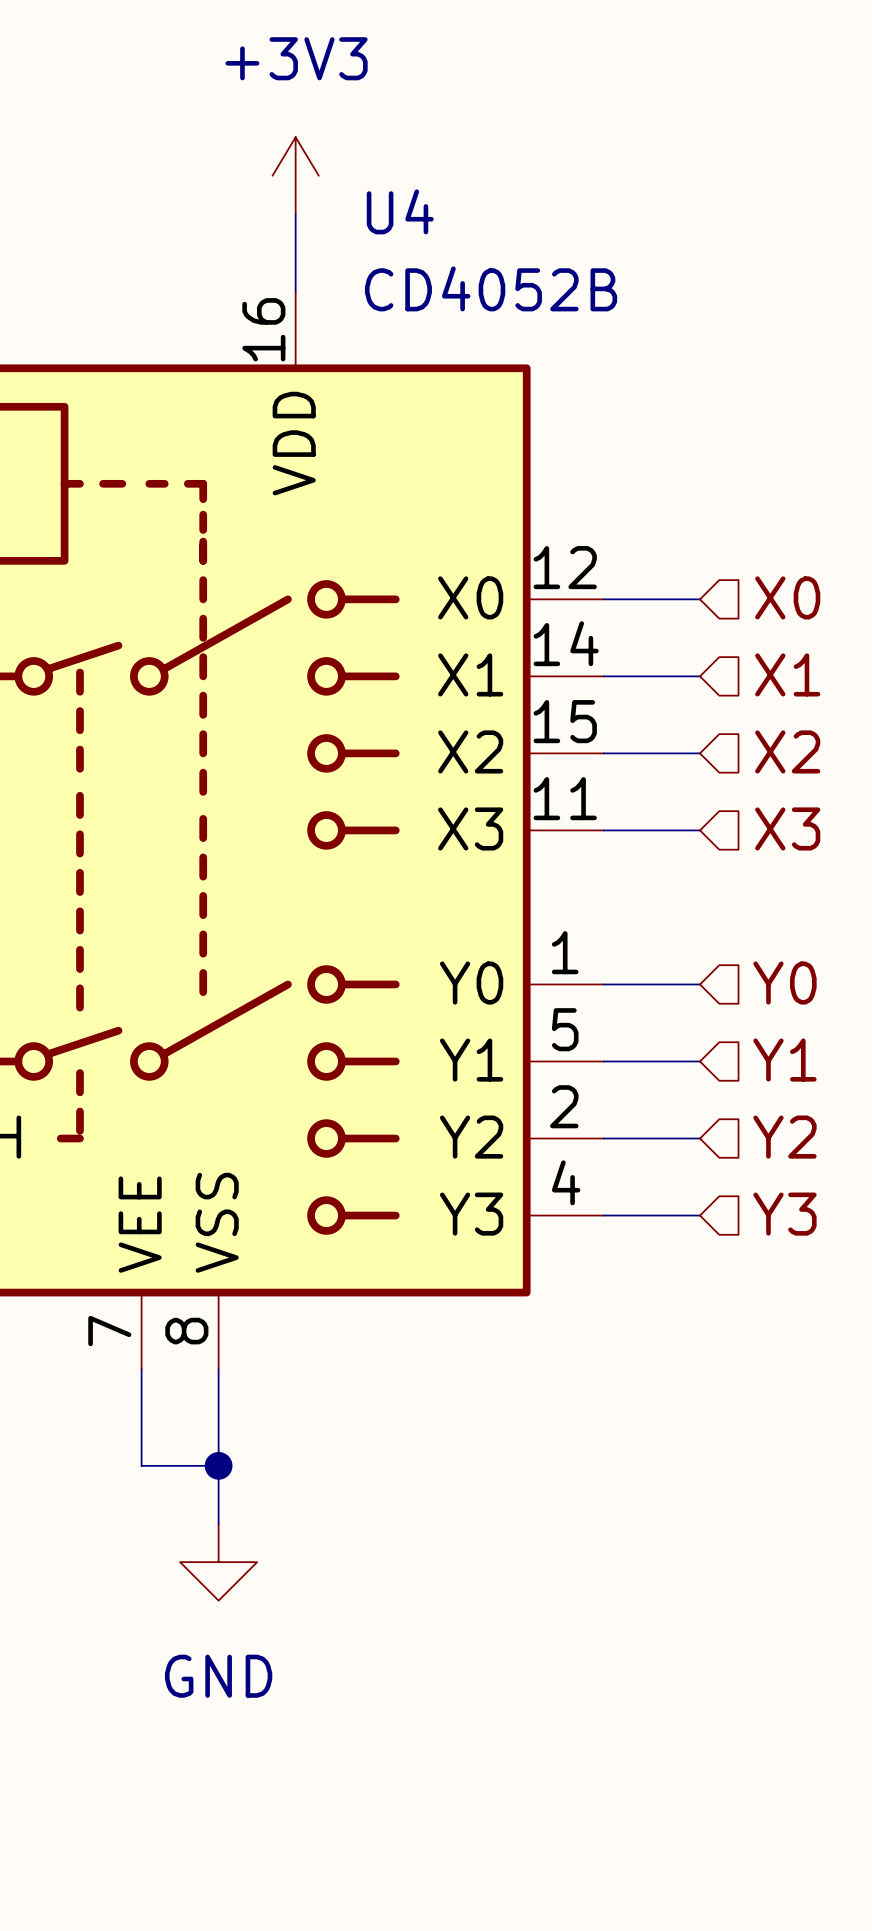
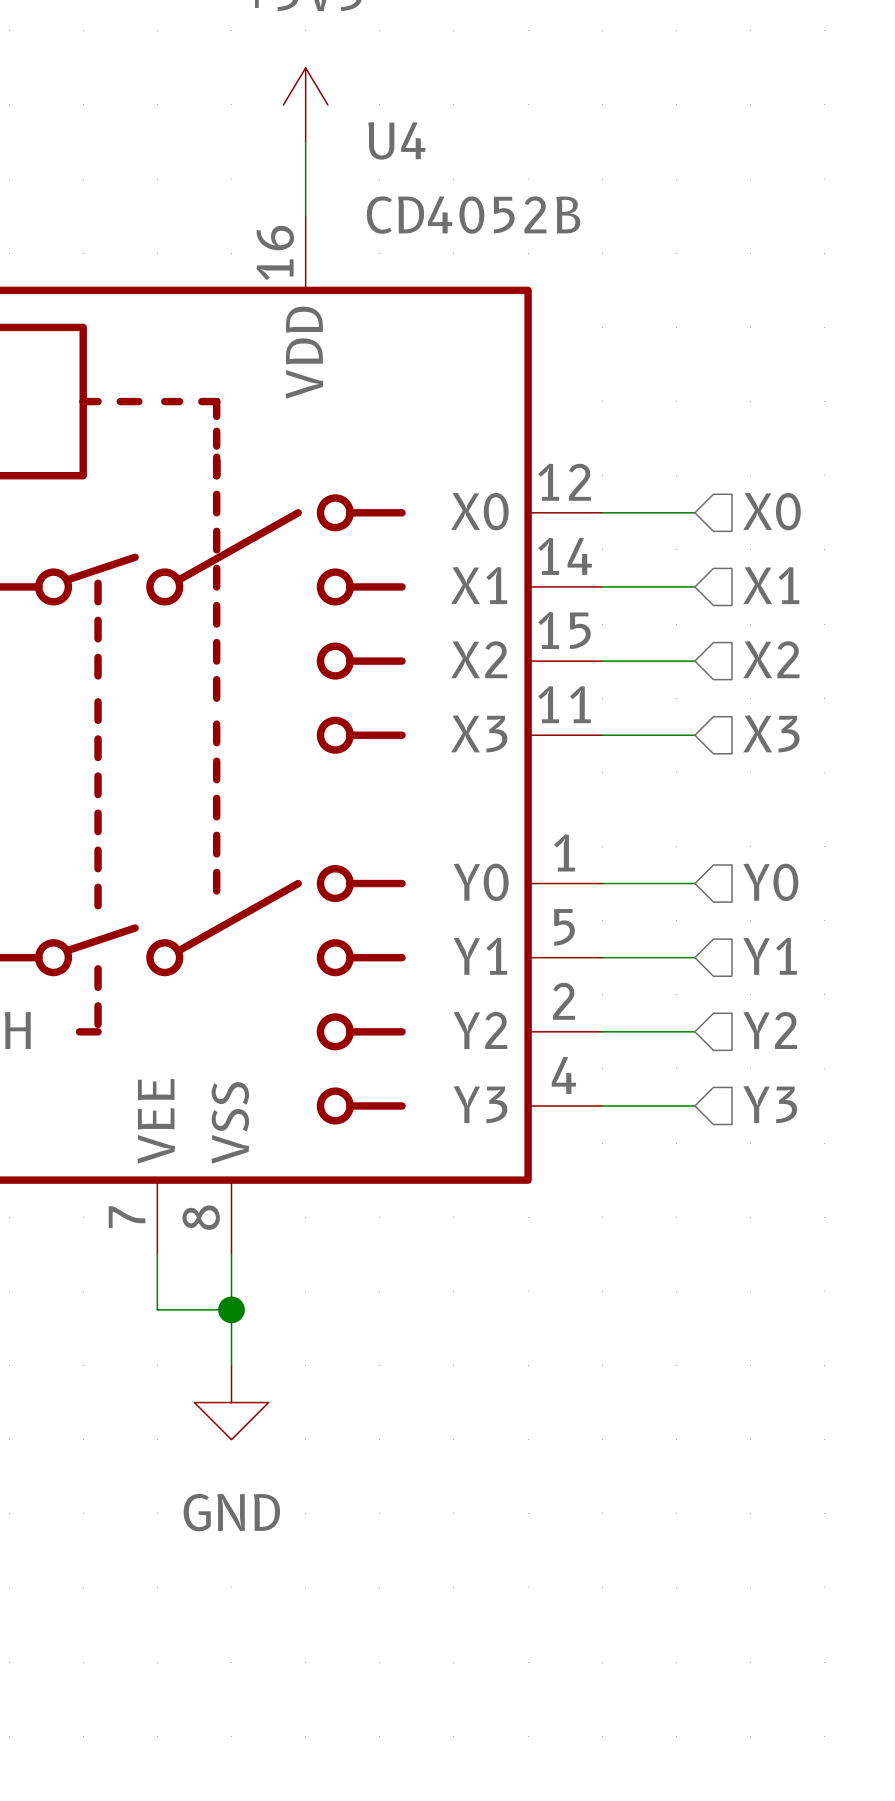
wire: (141, 1427) (141, 1465) (218, 1465) -> (157, 1309) (231, 1309)
junction position: (218, 1465) -> (231, 1309)
power symbol position: GND (218, 1562) -> GND (231, 1402)

